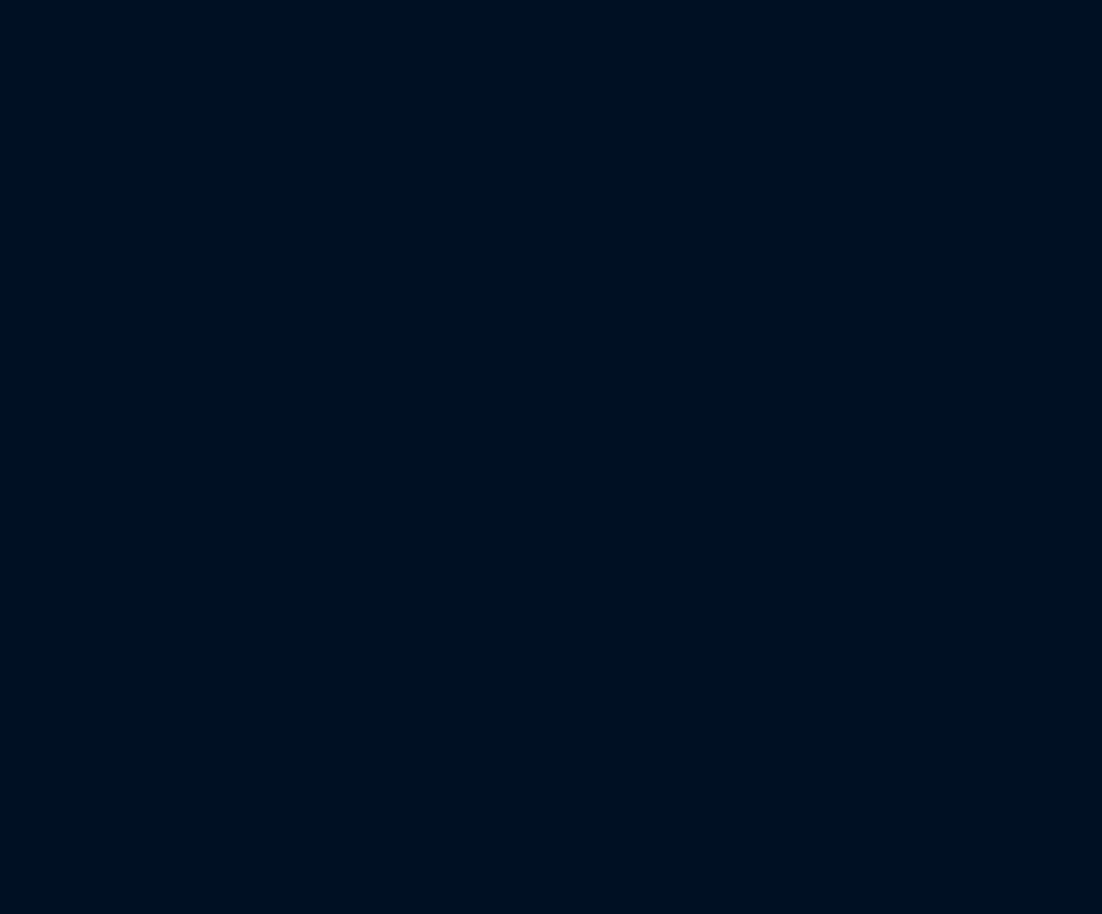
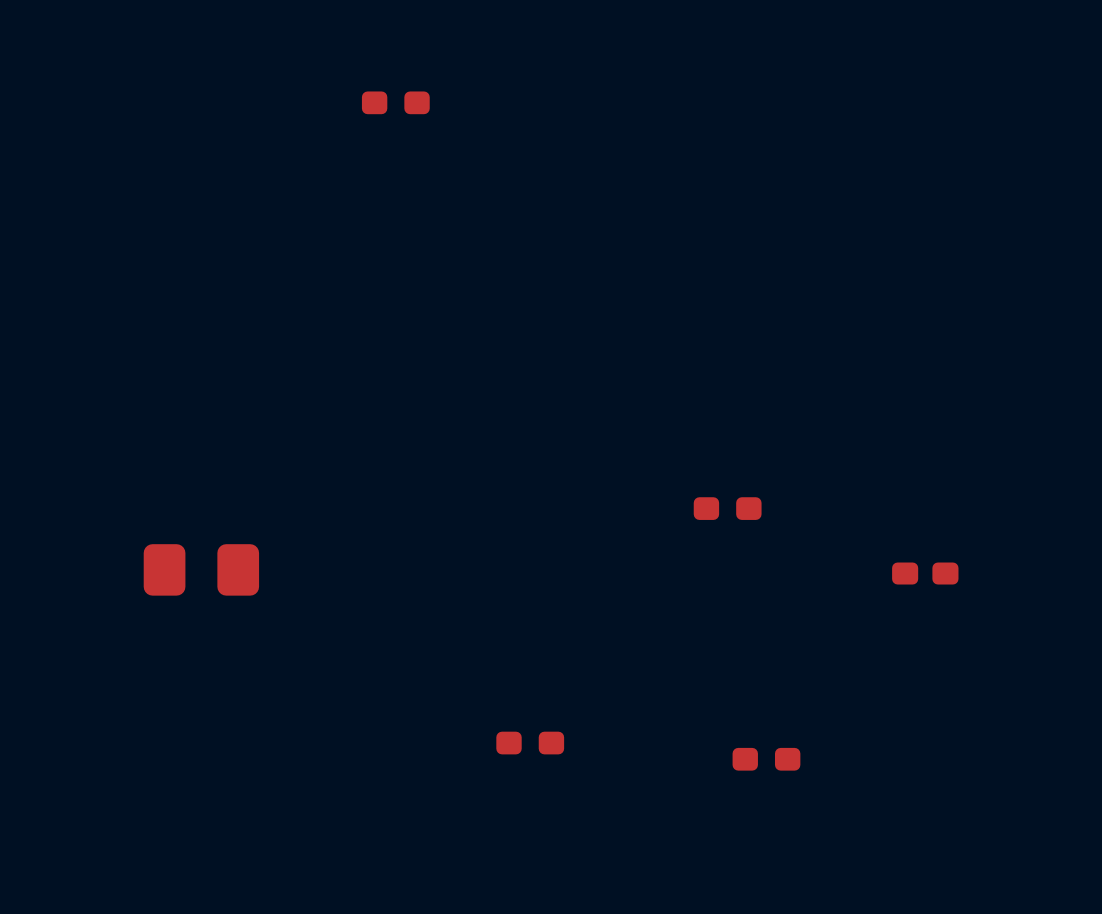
part: none -> (395, 102)
part: none -> (727, 508)
part: none -> (201, 569)
part: none -> (925, 573)
part: none -> (530, 743)
part: none -> (766, 759)

